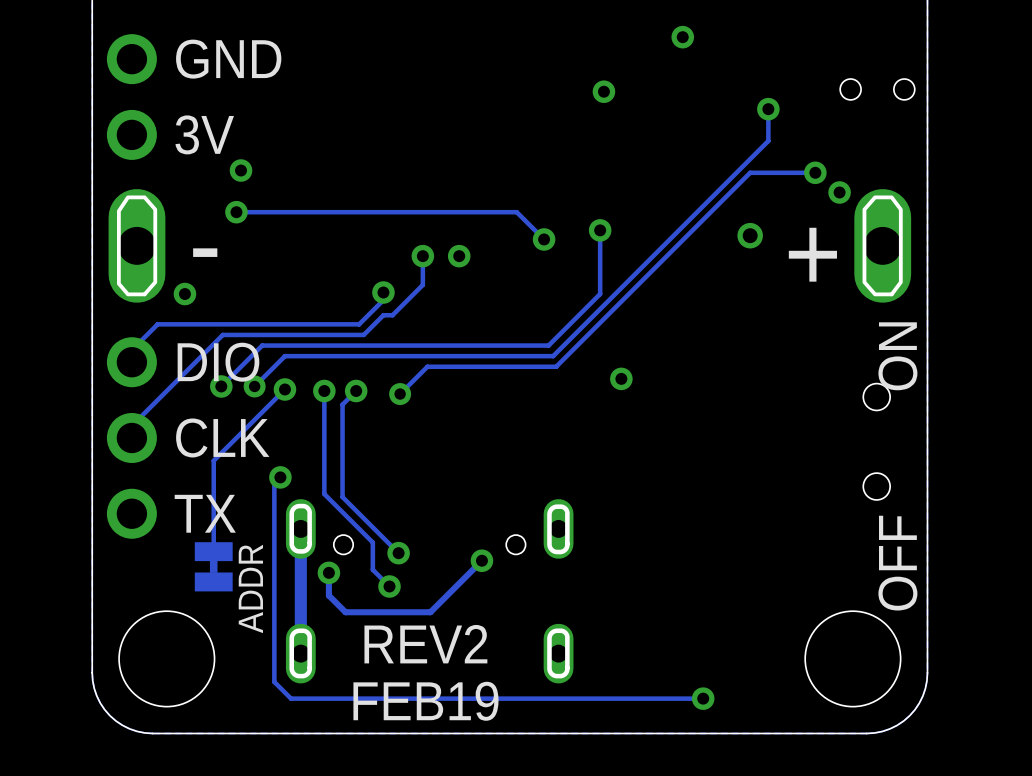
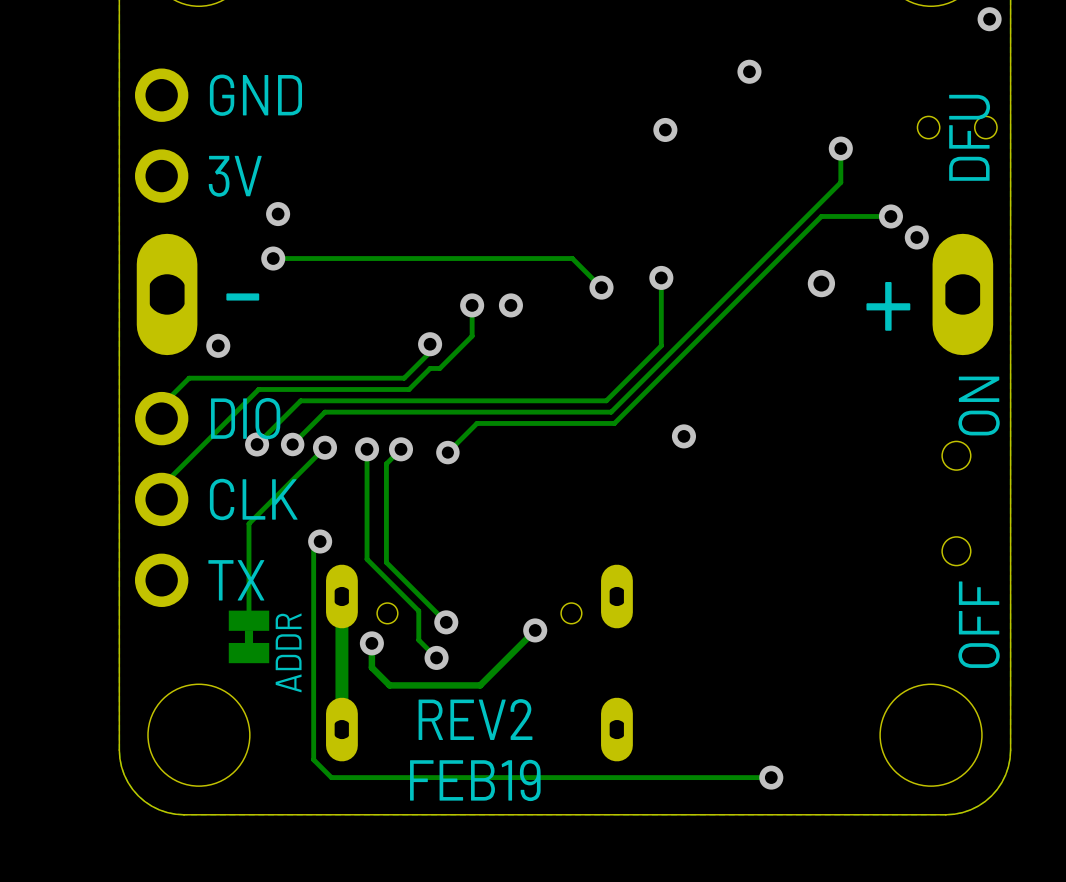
text: none -> DFU (969, 137)

